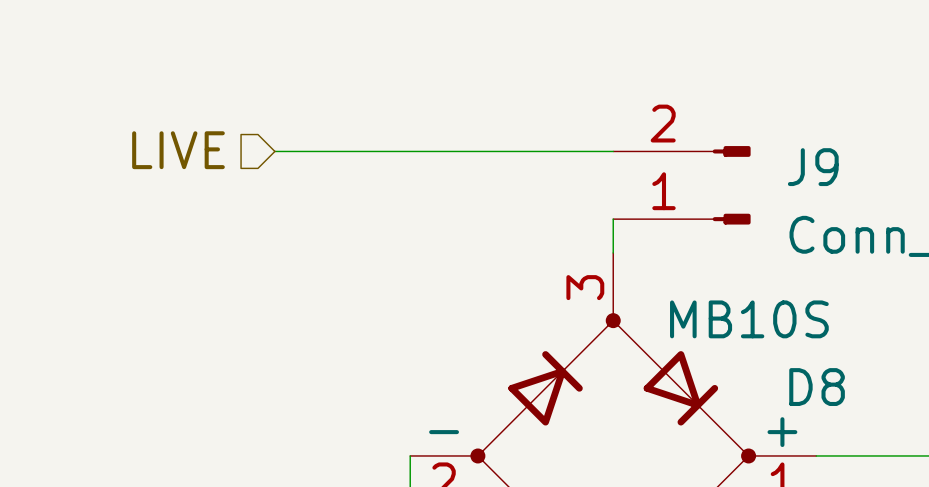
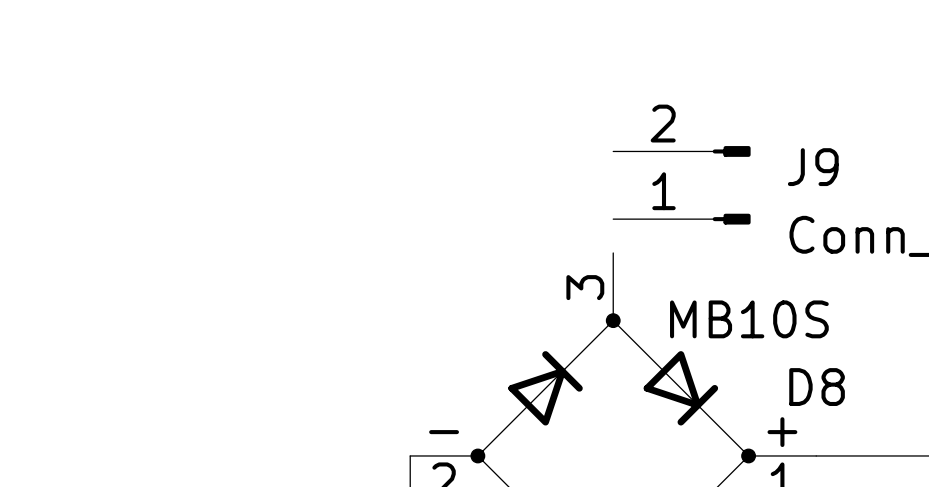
hierarchical label: LIVE (178, 150) -> none
wire: (274, 151) (613, 151) -> none
wire: (613, 219) (613, 252) -> none

